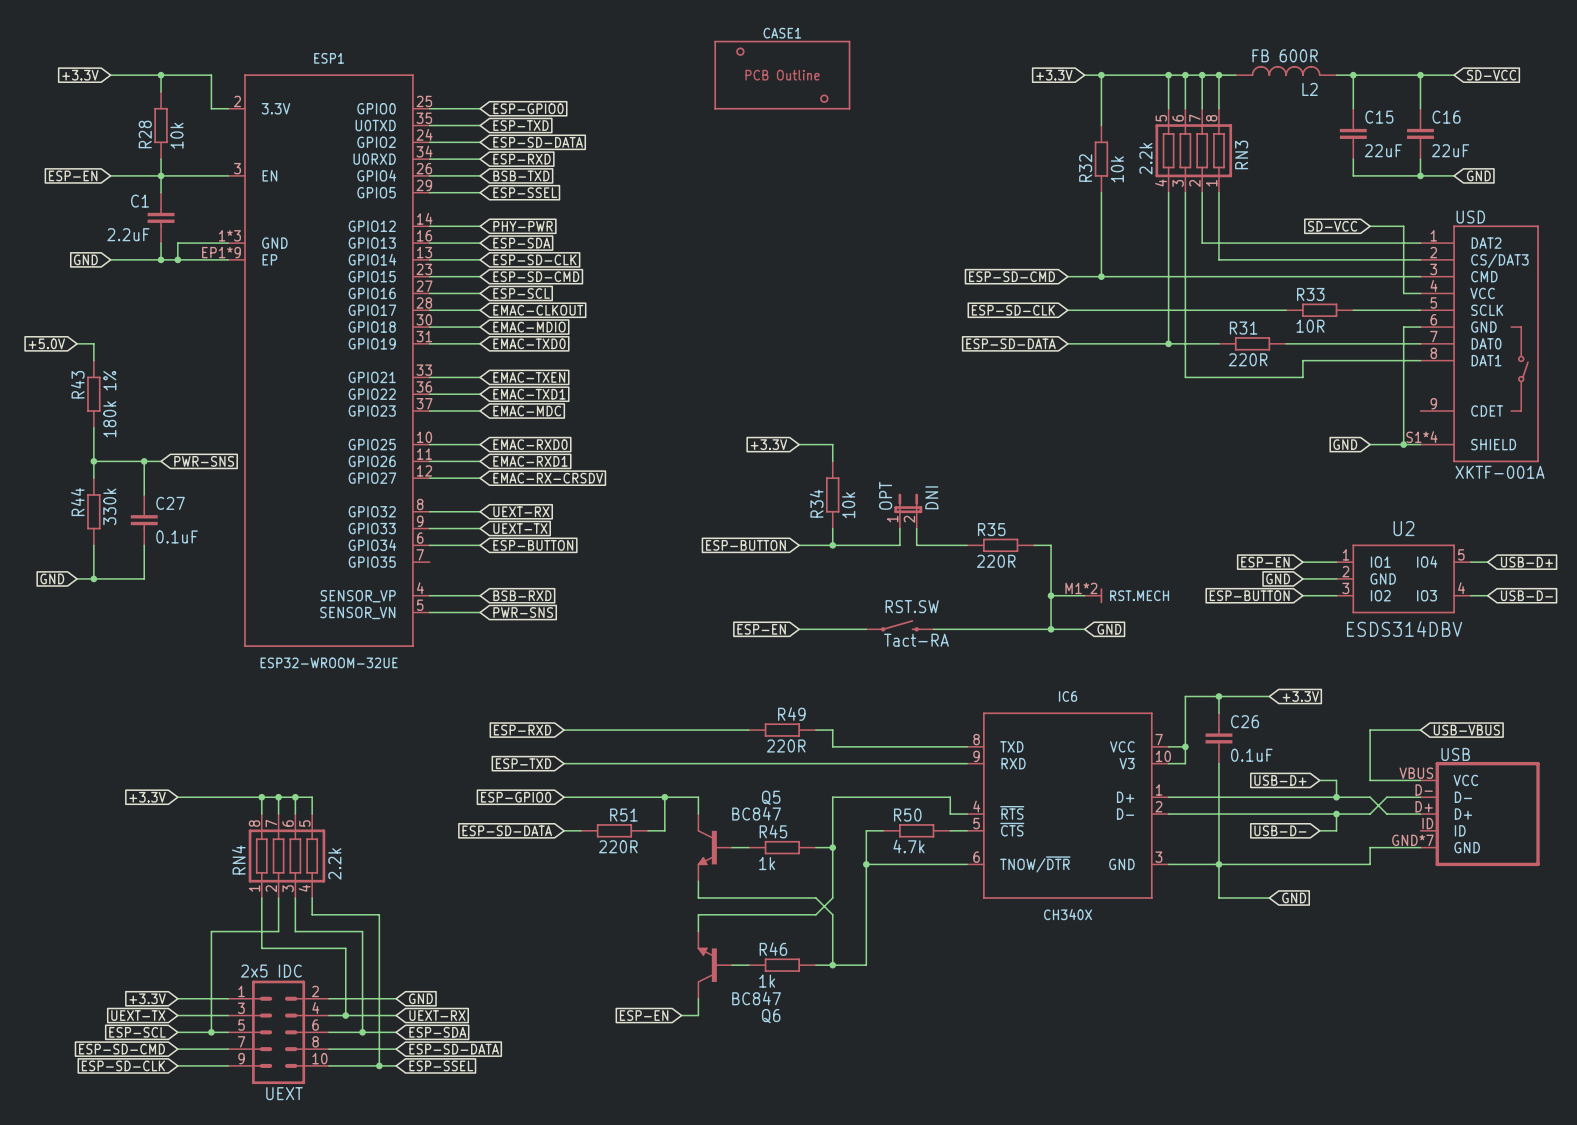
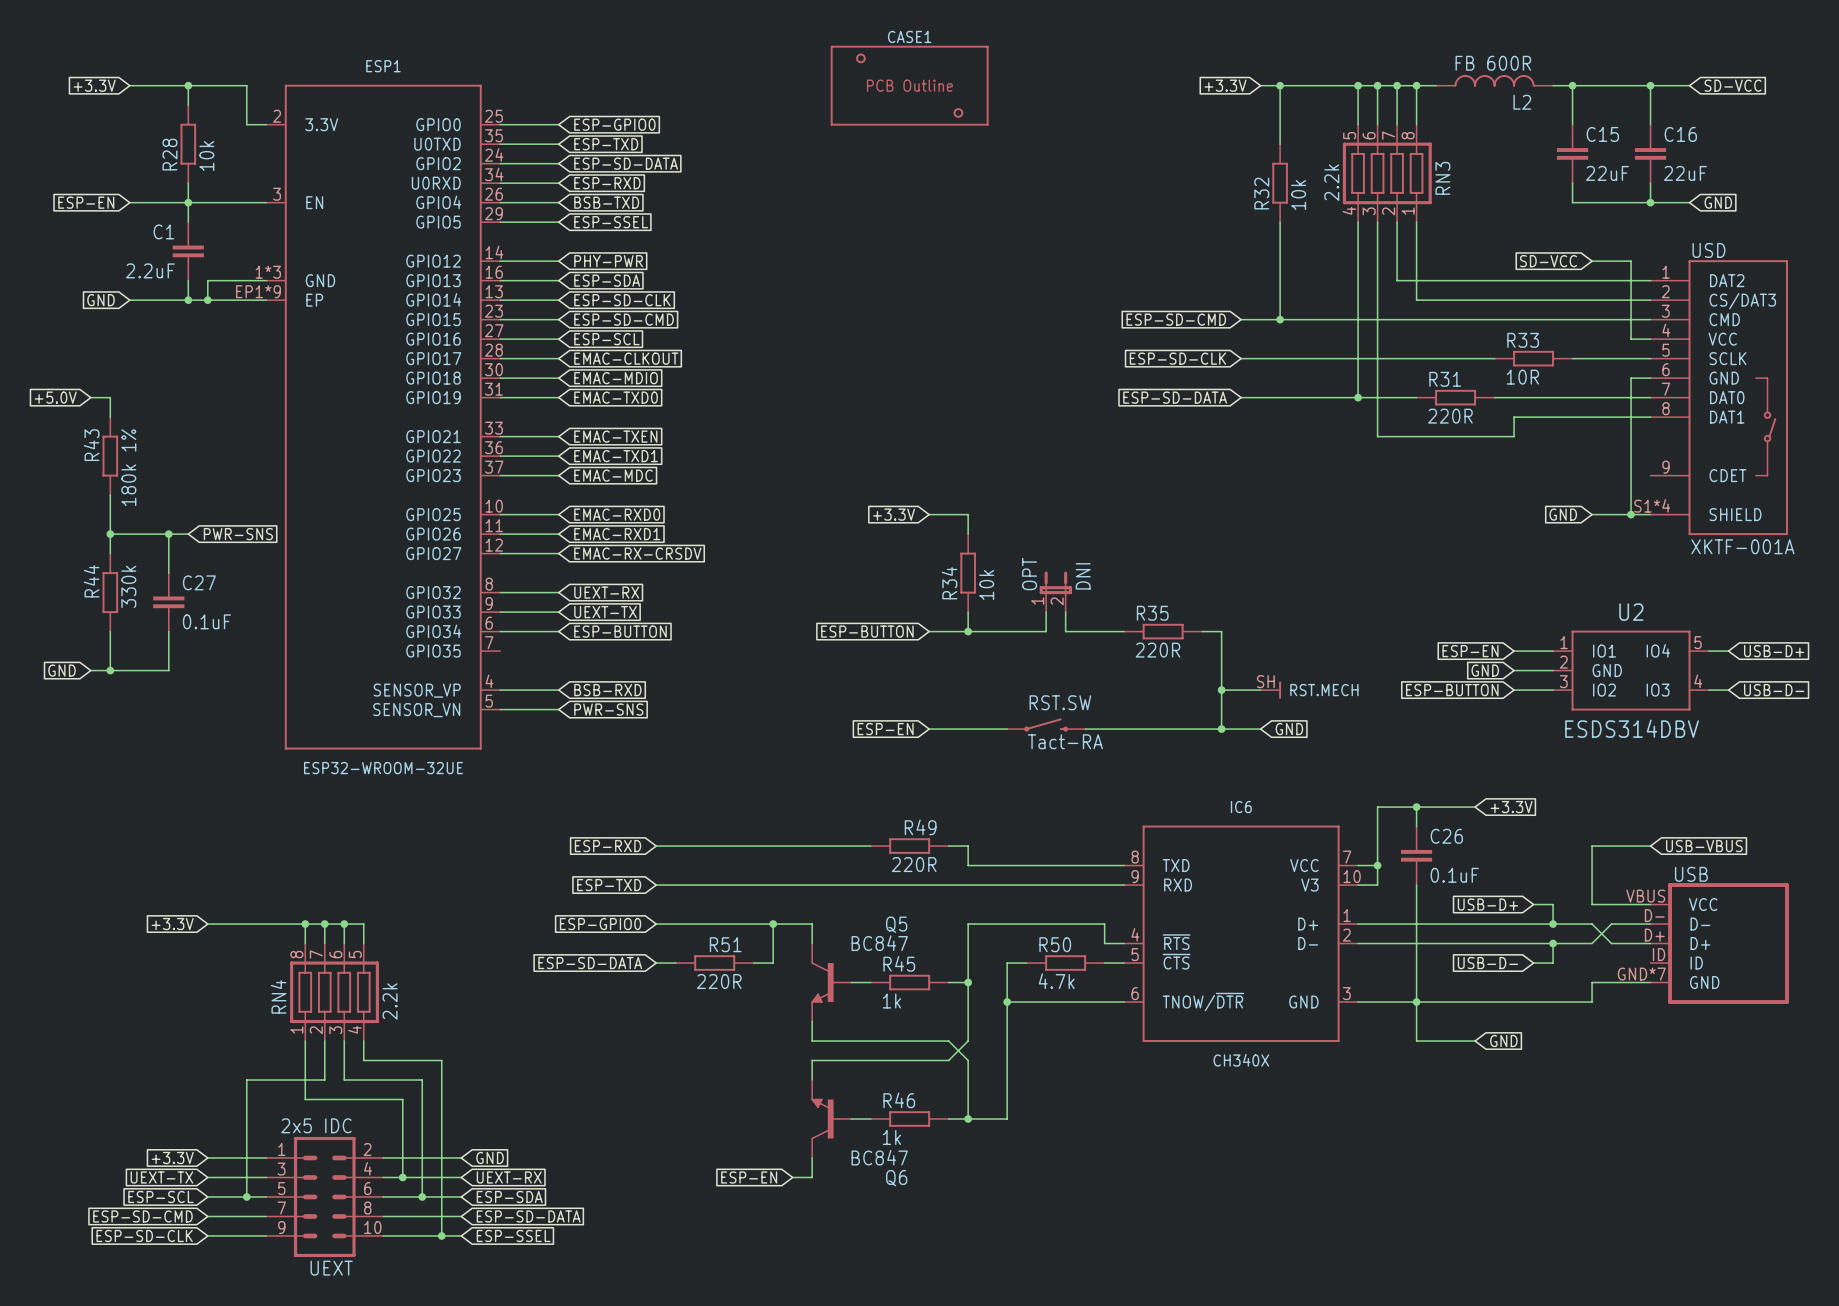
RST.MECH pin number: M1*2 (1081, 588) -> SH (1265, 681)

